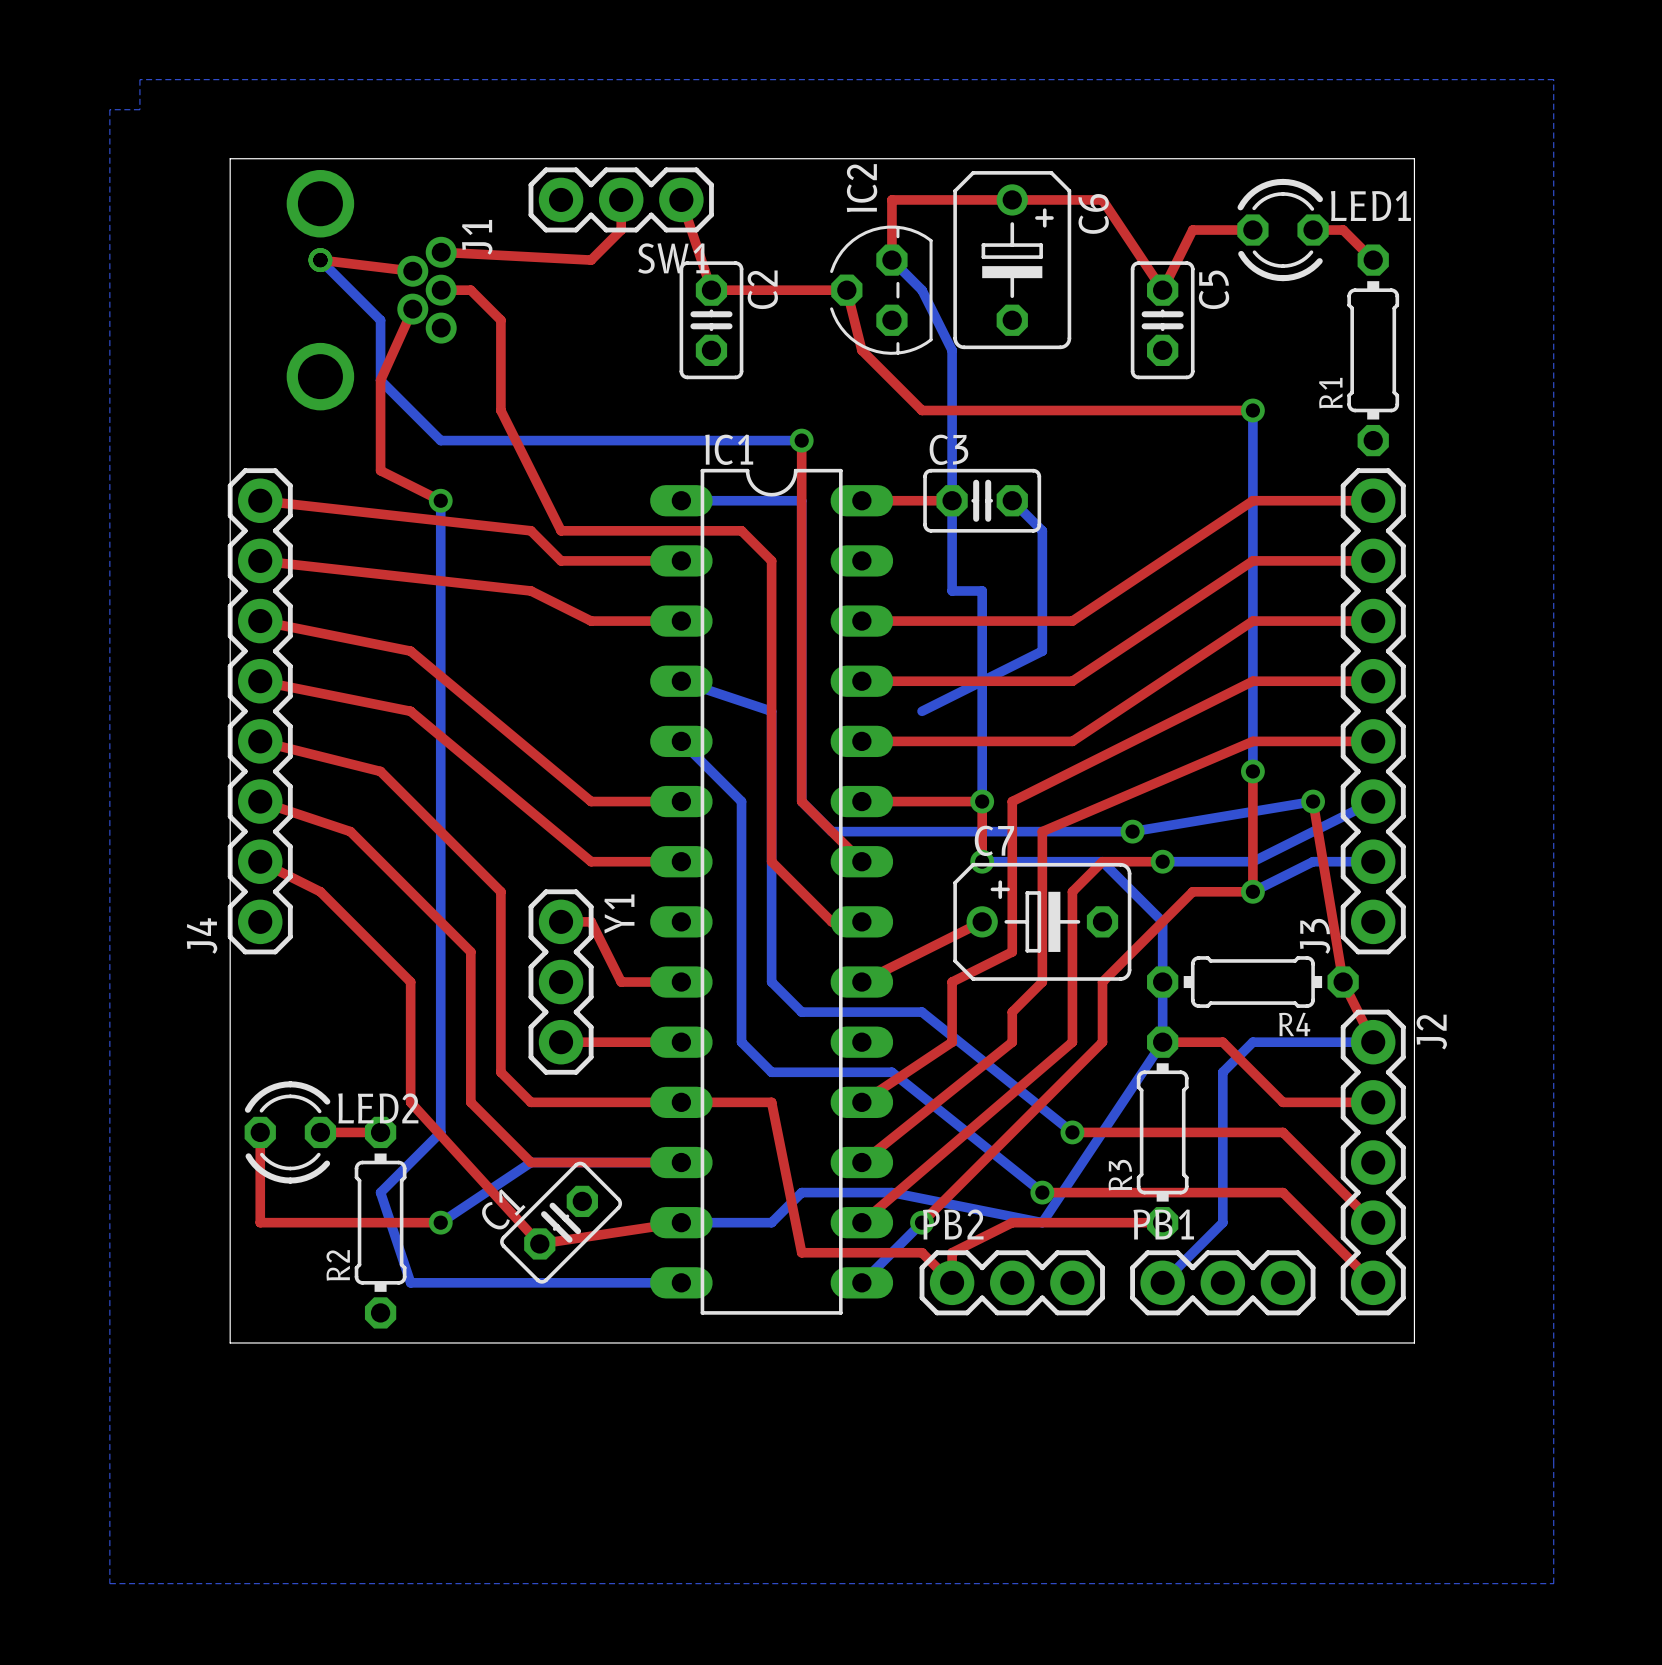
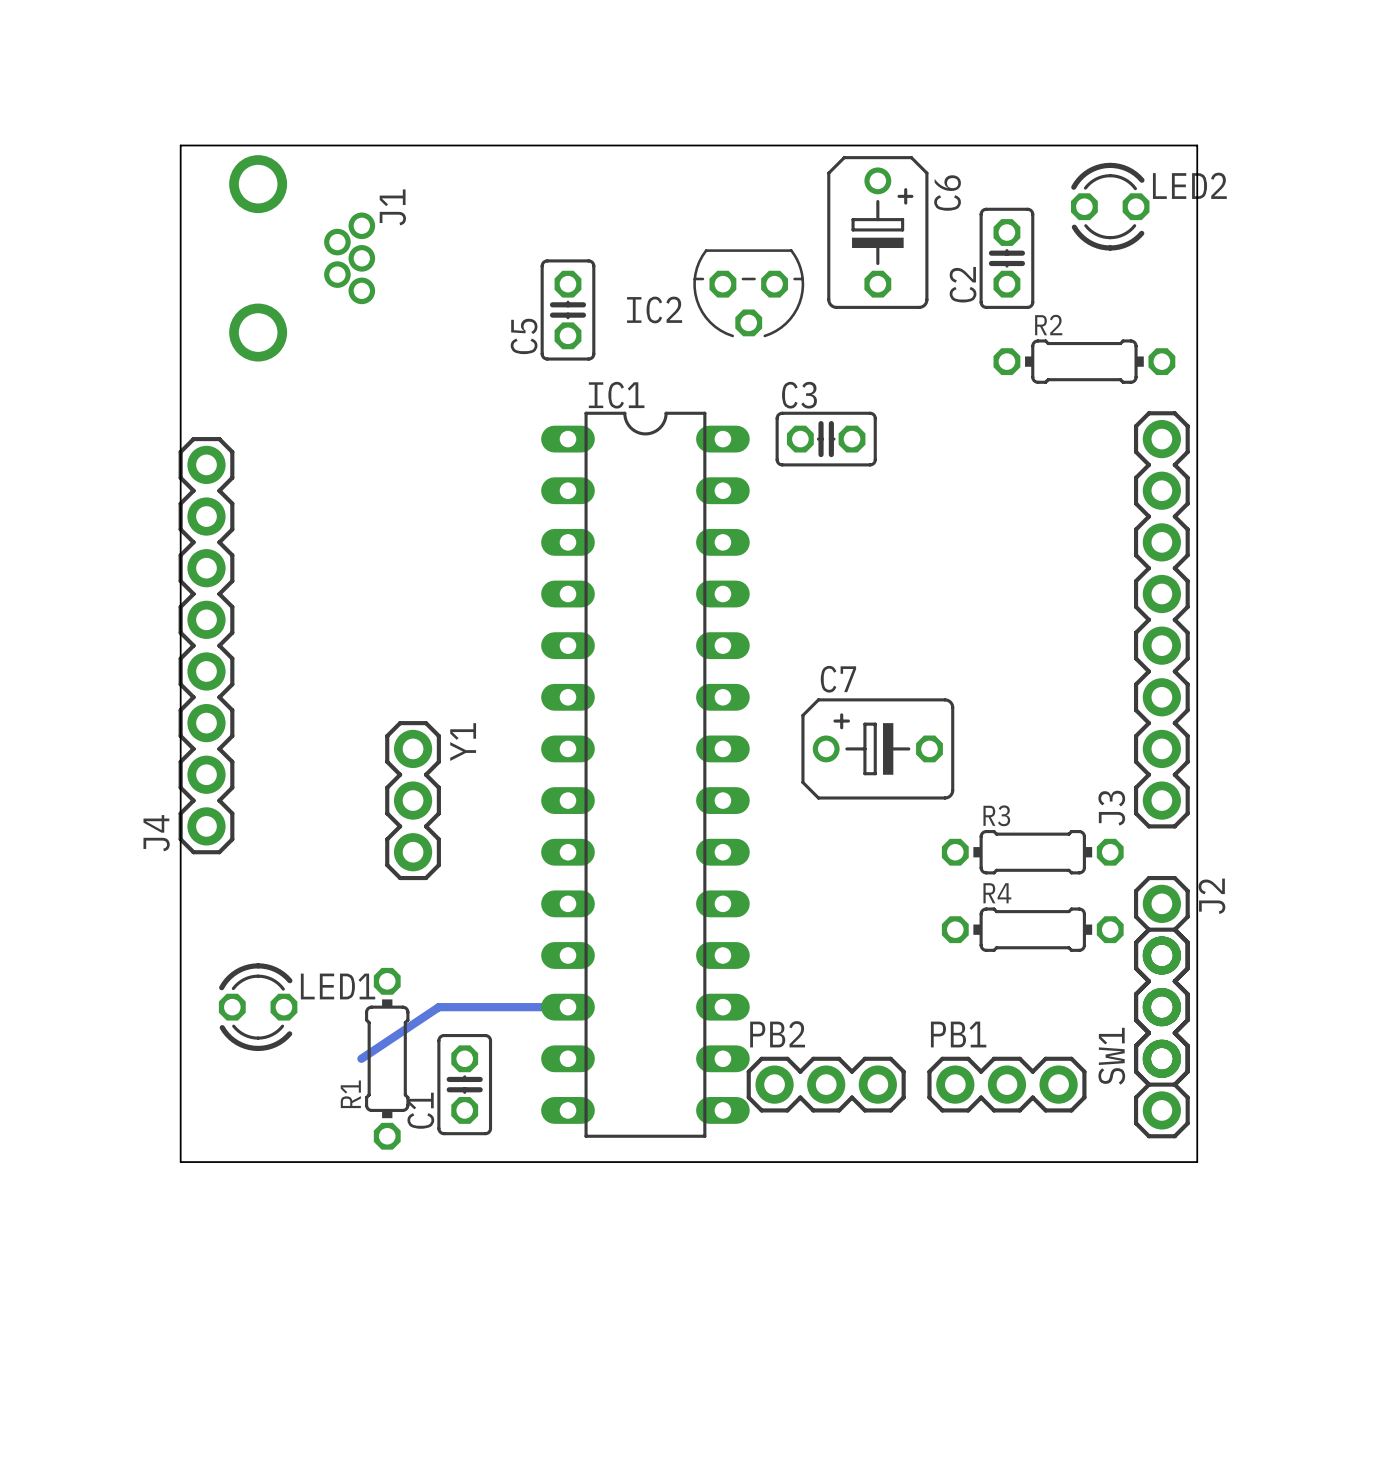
bottom zone outline: (139, 79) (1553, 79) (1553, 1583) (109, 1583) (109, 109) (139, 109) (139, 79) -> none
top track: (621, 199) (621, 230) (591, 260) (441, 252) -> none
SW1 rotation: 0° (621, 199) -> 90° clockwise (1161, 1007)
SW1 position: (621, 199) -> (1161, 1007)
top track: (681, 199) (711, 290) (846, 290) (861, 350) (922, 410) (1252, 410) -> none
top track: (1252, 230) (1192, 230) (1162, 290) (1102, 199) (891, 199) (891, 260) -> none
LED1 position: (1282, 230) -> (258, 1007)
top track: (1313, 230) (1343, 230) (1373, 260) -> none
bottom track: (320, 260) (380, 320) (380, 380) (440, 440) (801, 440) -> none
top track: (320, 260) (412, 271) -> none
via: (320, 260) -> none
bottom track: (891, 260) (922, 290) (952, 350) (952, 590) (982, 590) (982, 801) -> none
C6 position: (1012, 260) -> (877, 232)
C2 name position: C2 (762, 289) -> C2 (963, 284)
C5 name position: C5 (1214, 289) -> C5 (524, 336)
top track: (441, 290) (470, 290) (500, 320) (500, 410) (561, 530) (741, 530) (771, 560) (771, 861) (831, 921) (861, 921) -> none
IC2 rotation: 0° (881, 290) -> 90° counterclockwise (748, 293)
top track: (412, 309) (380, 380) (380, 470) (440, 500) -> none
C2 position: (711, 320) -> (1006, 258)
C5 position: (1162, 320) -> (567, 309)
R1 position: (1373, 350) -> (387, 1058)
bottom track: (1252, 410) (1252, 771) -> none
via: (1252, 410) -> none
top track: (801, 440) (801, 801) (861, 861) -> none
via: (801, 440) -> none
top track: (260, 500) (530, 530) (561, 560) (681, 560) -> none
bottom track: (440, 500) (440, 1132) (380, 1192) (410, 1282) (681, 1282) -> none
via: (440, 500) -> none
bottom track: (681, 500) (801, 500) (801, 801) (831, 831) (1132, 831) (1313, 801) -> none
top track: (861, 500) (952, 500) -> none
bottom track: (1012, 500) (1042, 530) (1042, 651) (922, 711) -> none
top track: (1373, 500) (1252, 500) (1072, 621) (861, 621) -> none
top track: (260, 560) (530, 590) (591, 621) (681, 621) -> none
top track: (1373, 560) (1252, 560) (1072, 681) (861, 681) -> none
top track: (260, 621) (410, 651) (591, 801) (681, 801) -> none
top track: (1373, 621) (1252, 621) (1072, 741) (861, 741) -> none
top track: (260, 681) (410, 711) (591, 861) (681, 861) -> none
bottom track: (681, 681) (771, 711) (771, 982) (801, 1012) (922, 1012) (1072, 1132) -> none
top track: (1373, 681) (1252, 681) (1012, 801) (1012, 951) (952, 982) (952, 1042) (861, 1102) -> none
J4 position: (260, 711) -> (206, 645)
top track: (260, 741) (380, 771) (500, 891) (500, 1072) (530, 1102) (771, 1102) (801, 1252) (922, 1252) (952, 1282) (952, 1252) (1012, 1222) (1162, 1222) -> none
bottom track: (681, 741) (741, 801) (741, 1042) (771, 1072) (891, 1072) (1042, 1192) -> none
top track: (1373, 741) (1252, 741) (1042, 831) (1042, 982) (1012, 1012) (1012, 1042) (861, 1162) -> none
top track: (1252, 771) (1252, 891) (1192, 891) (1102, 982) (1102, 1042) (922, 1222) -> none
via: (1252, 771) -> none
top track: (260, 801) (350, 831) (470, 951) (470, 1102) (530, 1162) (681, 1162) -> none
top track: (861, 801) (982, 801) (982, 861) -> none
via: (982, 801) -> none
top track: (1313, 801) (1343, 982) (1373, 1042) -> none
via: (1313, 801) -> none
bottom track: (1373, 801) (1252, 861) (1162, 861) -> none
via: (1132, 831) -> none
top track: (260, 861) (320, 891) (410, 982) (410, 1102) (539, 1243) (681, 1222) -> none
bottom track: (982, 861) (1102, 861) (1162, 921) (1162, 1042) (1042, 1222) (891, 1192) (801, 1192) (771, 1222) (681, 1222) -> none
via: (982, 861) -> none
top track: (1162, 861) (1102, 861) (1072, 891) (1072, 1042) (861, 1222) -> none
via: (1162, 861) -> none
bottom track: (1373, 861) (1313, 861) (1252, 891) -> none
via: (1252, 891) -> none
top track: (561, 921) (591, 921) (621, 982) (681, 982) -> none
top track: (982, 921) (861, 982) -> none
C7 position: (1042, 921) -> (877, 748)
Y1 position: (561, 982) -> (413, 800)
R4 position: (1252, 982) -> (1032, 929)
R4 name position: R4 (1294, 1024) -> R4 (997, 893)
top track: (561, 1042) (681, 1042) -> none
top track: (1162, 1042) (1222, 1042) (1282, 1102) (1373, 1102) -> none
bottom track: (1373, 1042) (1252, 1042) (1222, 1072) (1222, 1222) (1162, 1282) -> none
top track: (260, 1132) (260, 1222) (440, 1222) -> none
LED2 position: (290, 1132) -> (1110, 206)
top track: (320, 1132) (380, 1132) -> none
top track: (1072, 1132) (1282, 1132) (1373, 1222) -> none
via: (1072, 1132) -> none
R3 rotation: 0° (1162, 1132) -> 90° clockwise (1032, 852)
R3 position: (1162, 1132) -> (1032, 852)
top track: (1042, 1192) (1282, 1192) (1373, 1282) -> none
via: (1042, 1192) -> none
R2 rotation: 0° (380, 1222) -> 90° clockwise (1084, 361)
R2 position: (380, 1222) -> (1084, 361)
via: (440, 1222) -> none
C1 rotation: 0° (561, 1222) -> 45° counterclockwise (464, 1084)
bottom track: (922, 1222) (861, 1282) -> none
via: (922, 1222) -> none
PB2 position: (1012, 1282) -> (826, 1084)
PB1 position: (1222, 1282) -> (1006, 1084)

